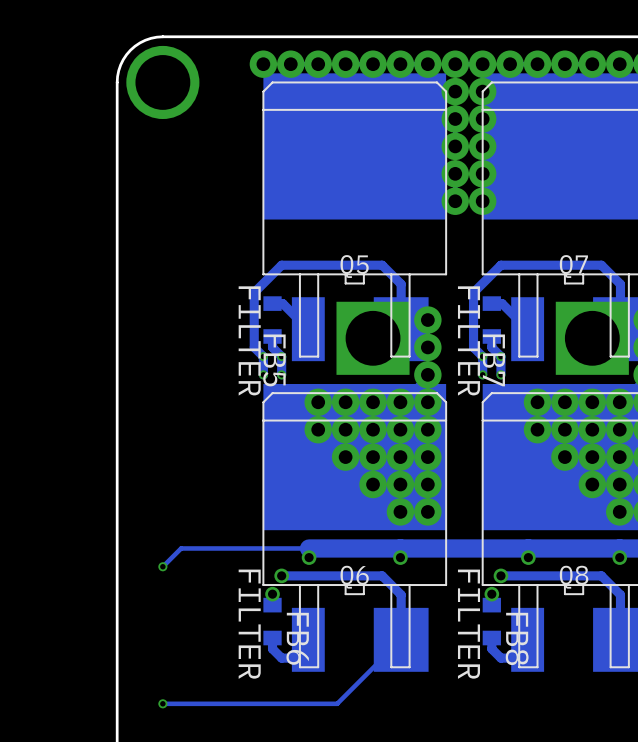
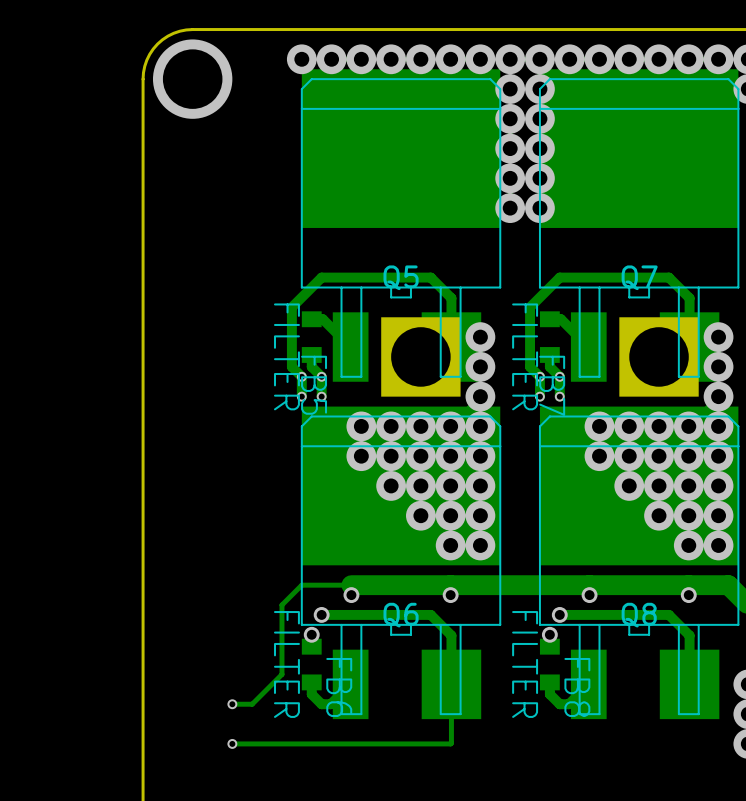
track: (263, 548) (181, 548) (162, 566) -> (301, 585) (281, 605) (281, 674) (252, 704) (232, 704)
via: (162, 566) -> none
track: (401, 639) (337, 703) (162, 703) -> (451, 684) (450, 743) (232, 743)
via: none -> (232, 704)
via: none -> (232, 743)
via: (162, 703) -> none

